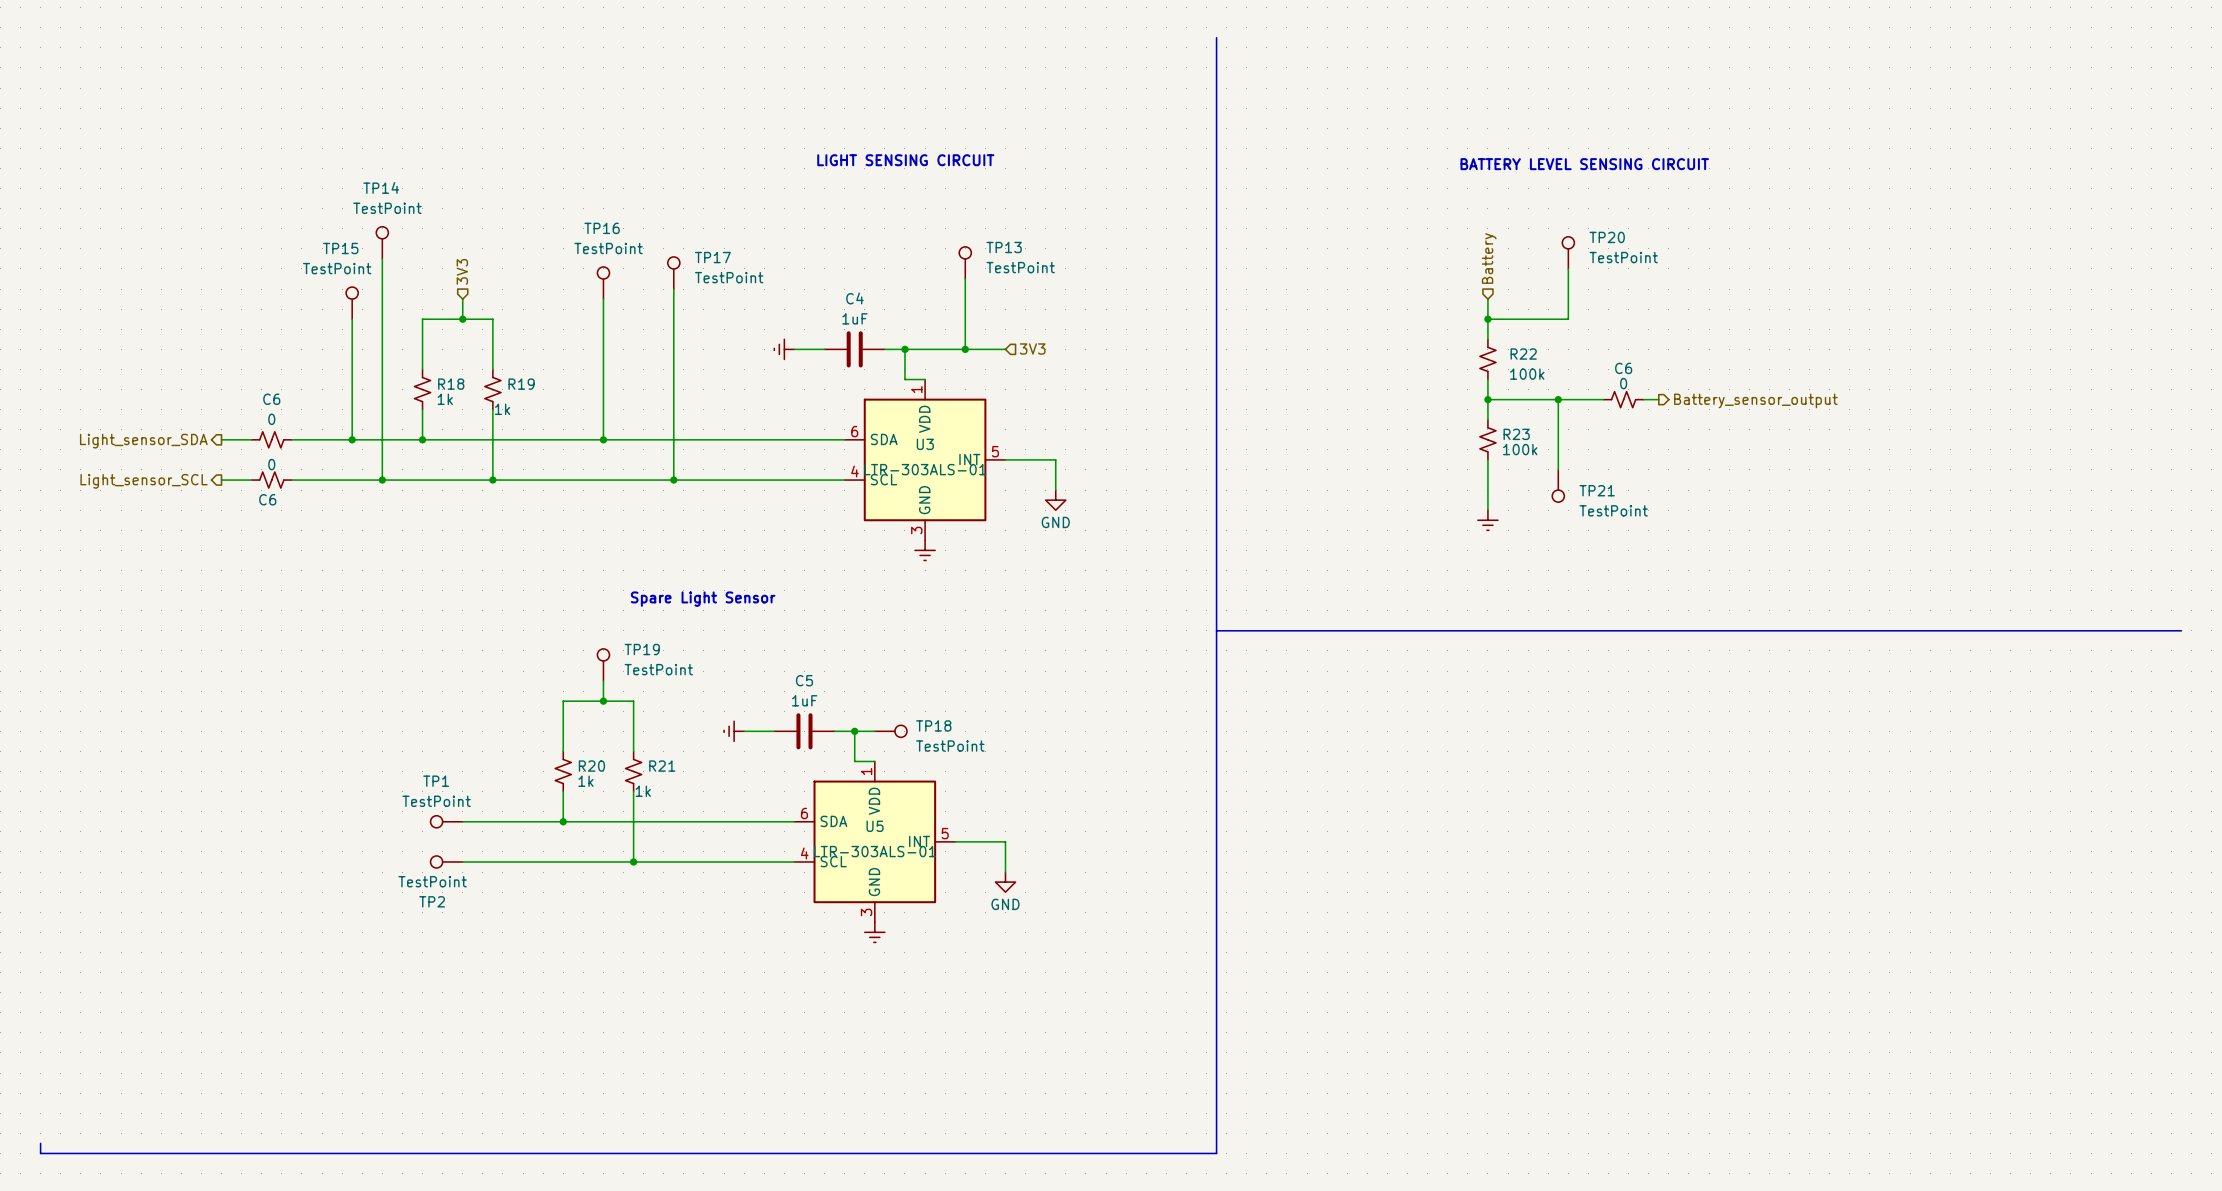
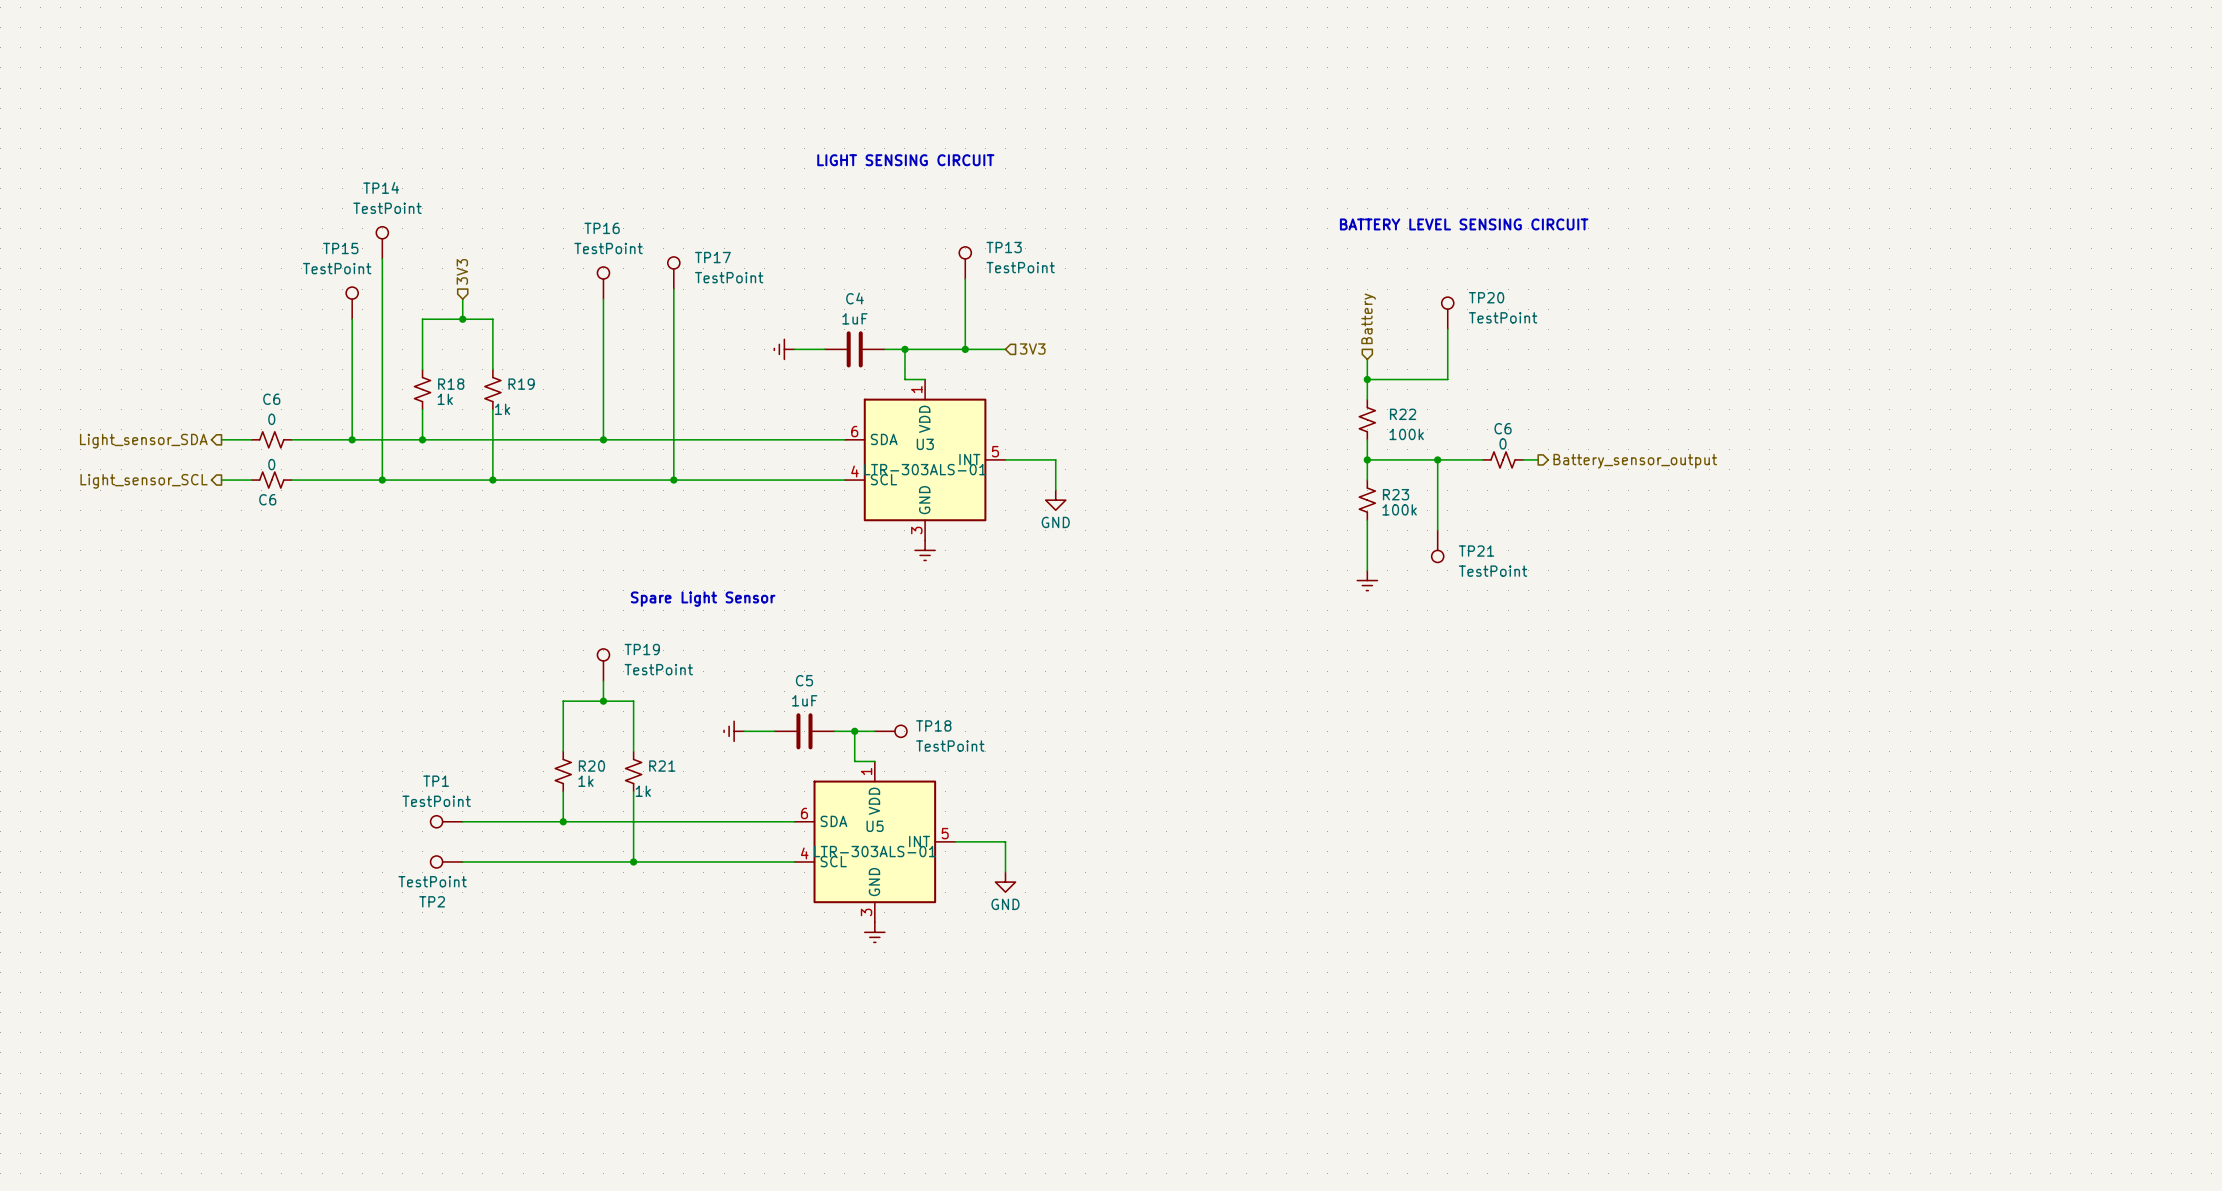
line: (1216, 37) (1216, 1153) (40, 1153) (40, 1143) -> none
text position: BATTERY LEVEL SENSING CIRCUIT (1584, 164) -> BATTERY LEVEL SENSING CIRCUIT (1464, 224)
TP20 position: (1568, 252) -> (1447, 313)
hierarchical label position: Battery (1489, 258) -> Battery (1368, 318)
wire: (1568, 268) (1568, 319) (1487, 319) -> (1447, 329) (1447, 379) (1367, 379)
wire: (1487, 299) (1487, 339) -> (1367, 359) (1367, 399)
junction: (1487, 319) -> none
R22 position: (1487, 359) -> (1367, 419)
junction: none -> (1367, 379)
wire: (1487, 379) (1487, 419) -> (1367, 439) (1367, 480)
wire: (1487, 399) (1603, 399) -> (1367, 459) (1482, 459)
junction: (1487, 399) -> none
wire: (1558, 399) (1558, 469) -> (1437, 459) (1437, 530)
junction: (1558, 399) -> none
C6 position: (1623, 399) -> (1503, 459)
wire: (1643, 399) (1658, 399) -> (1523, 459) (1538, 459)
hierarchical label position: Battery_sensor_output (1755, 400) -> Battery_sensor_output (1635, 461)
R23 position: (1487, 439) -> (1367, 500)
junction: none -> (1367, 459)
junction: none -> (1437, 459)
wire: (1487, 459) (1487, 510) -> (1367, 520) (1367, 570)
TP21 position: (1558, 486) -> (1437, 546)
power symbol position: (1487, 520) -> (1367, 580)
line: (1216, 630) (2181, 630) -> none

